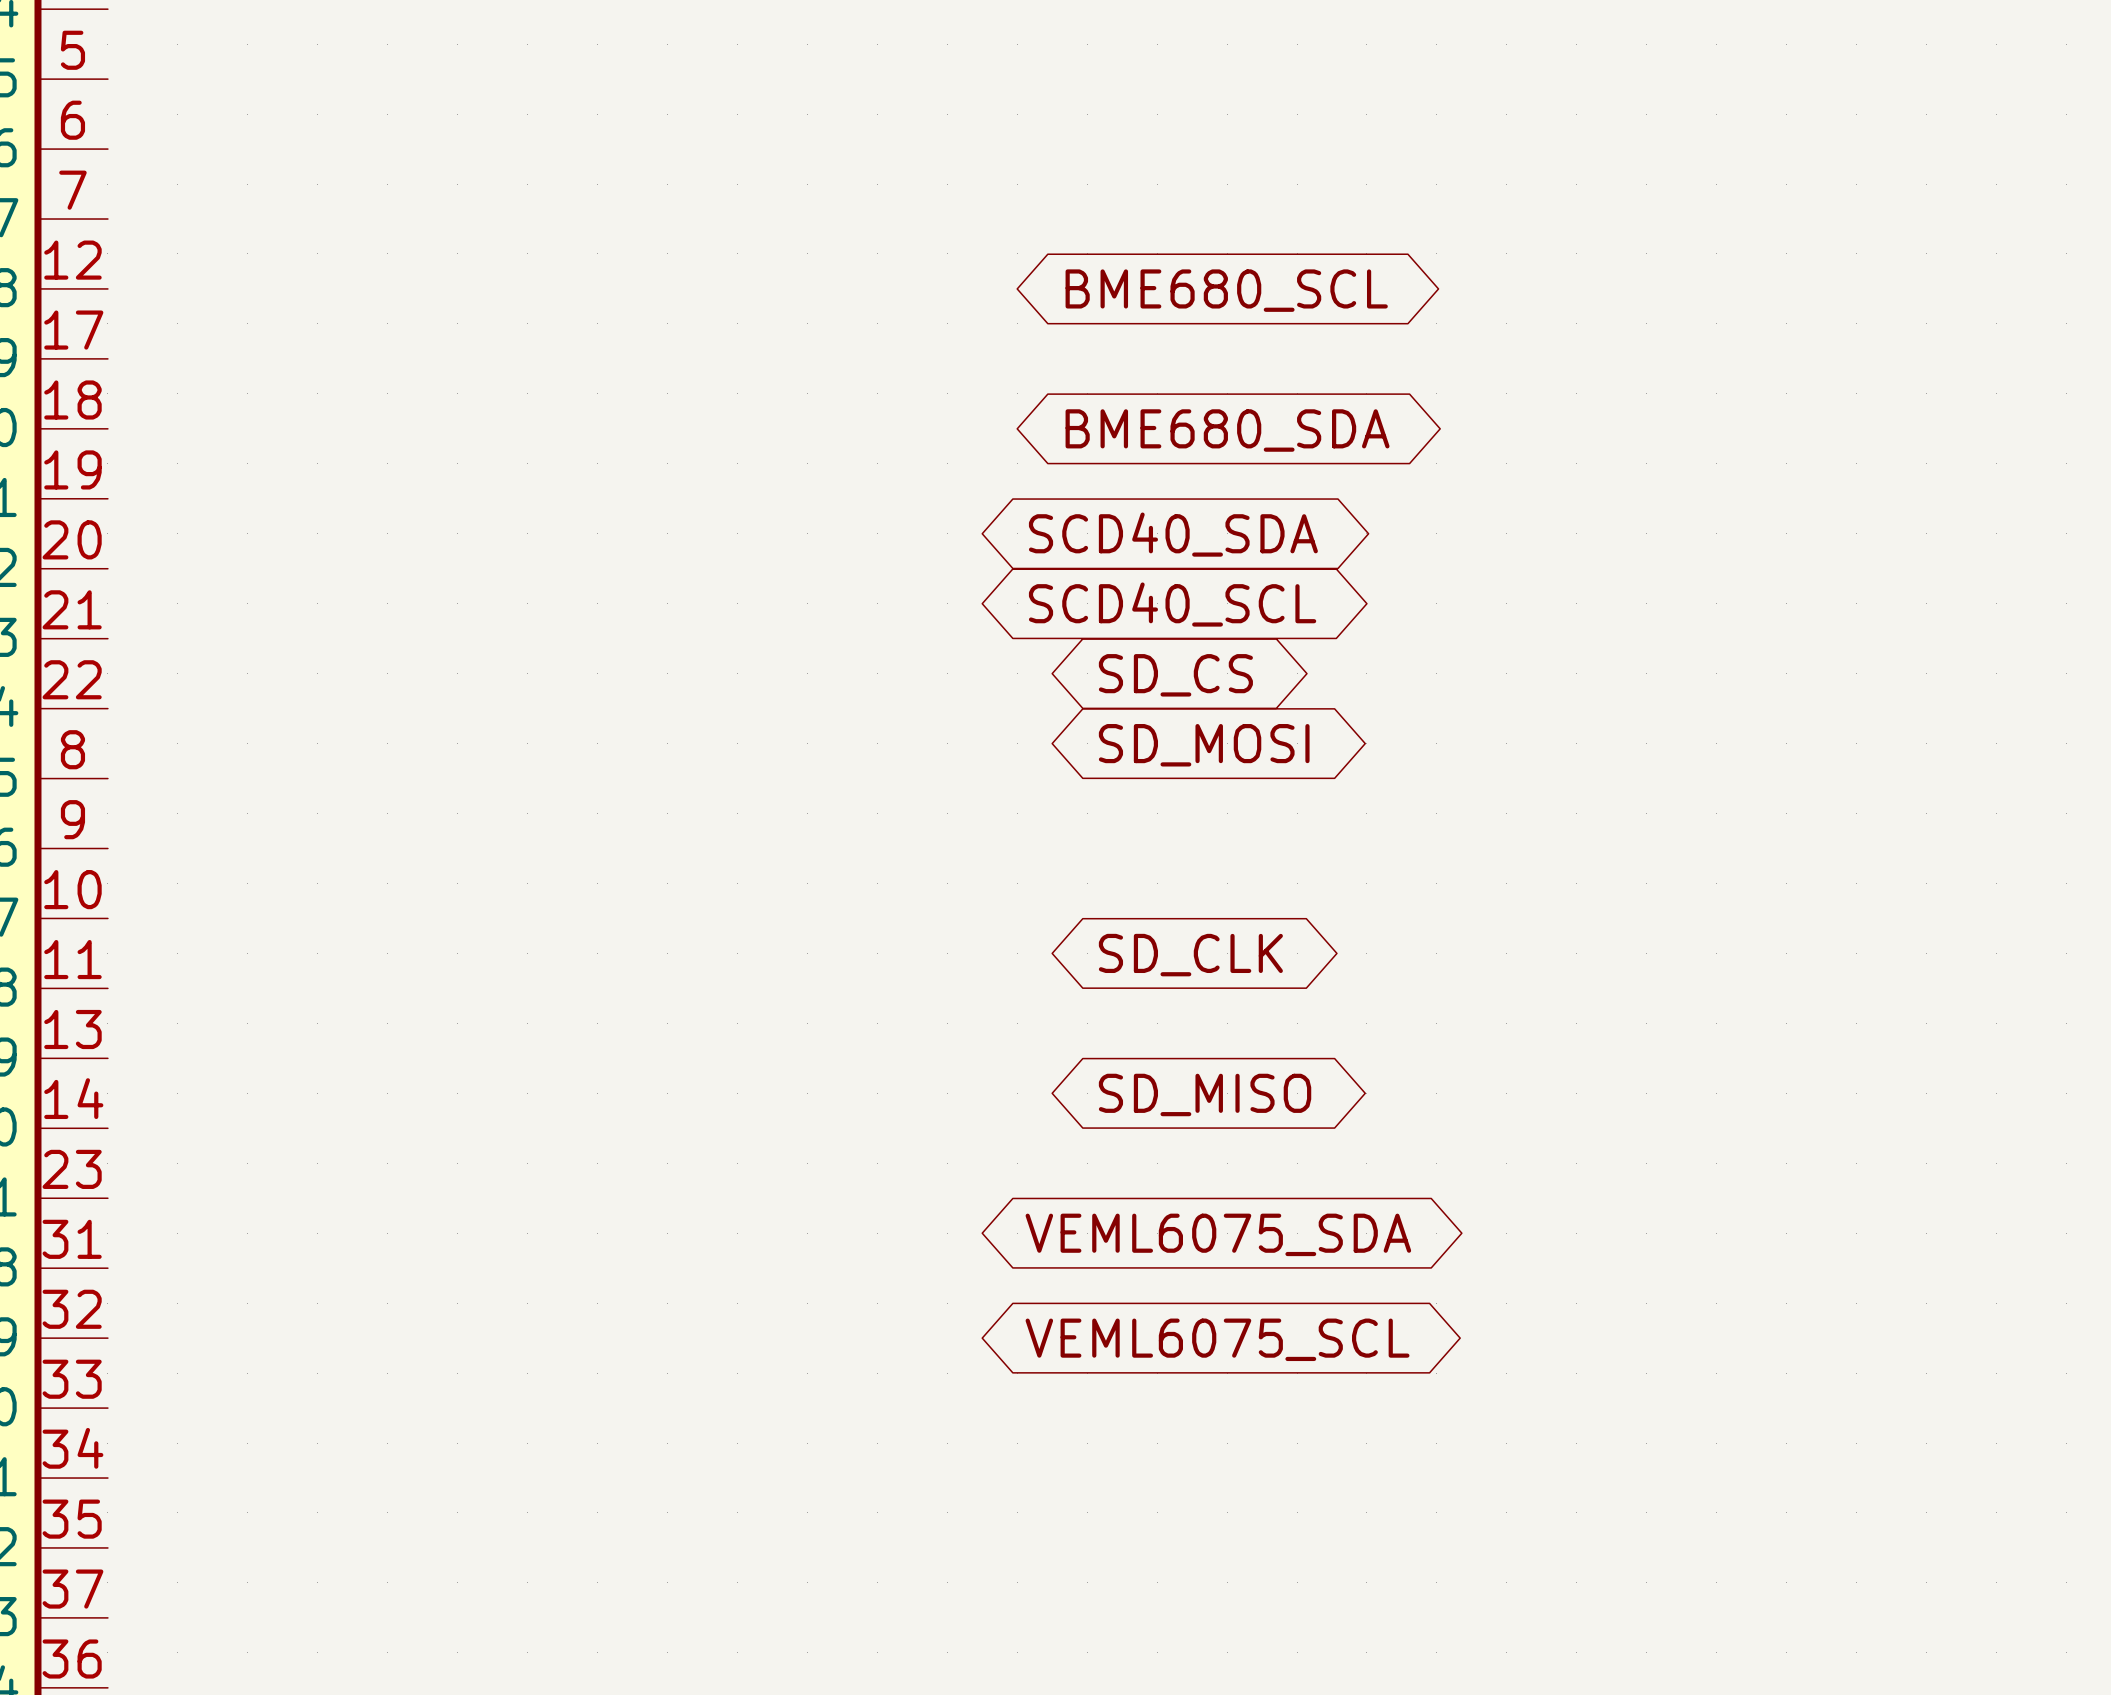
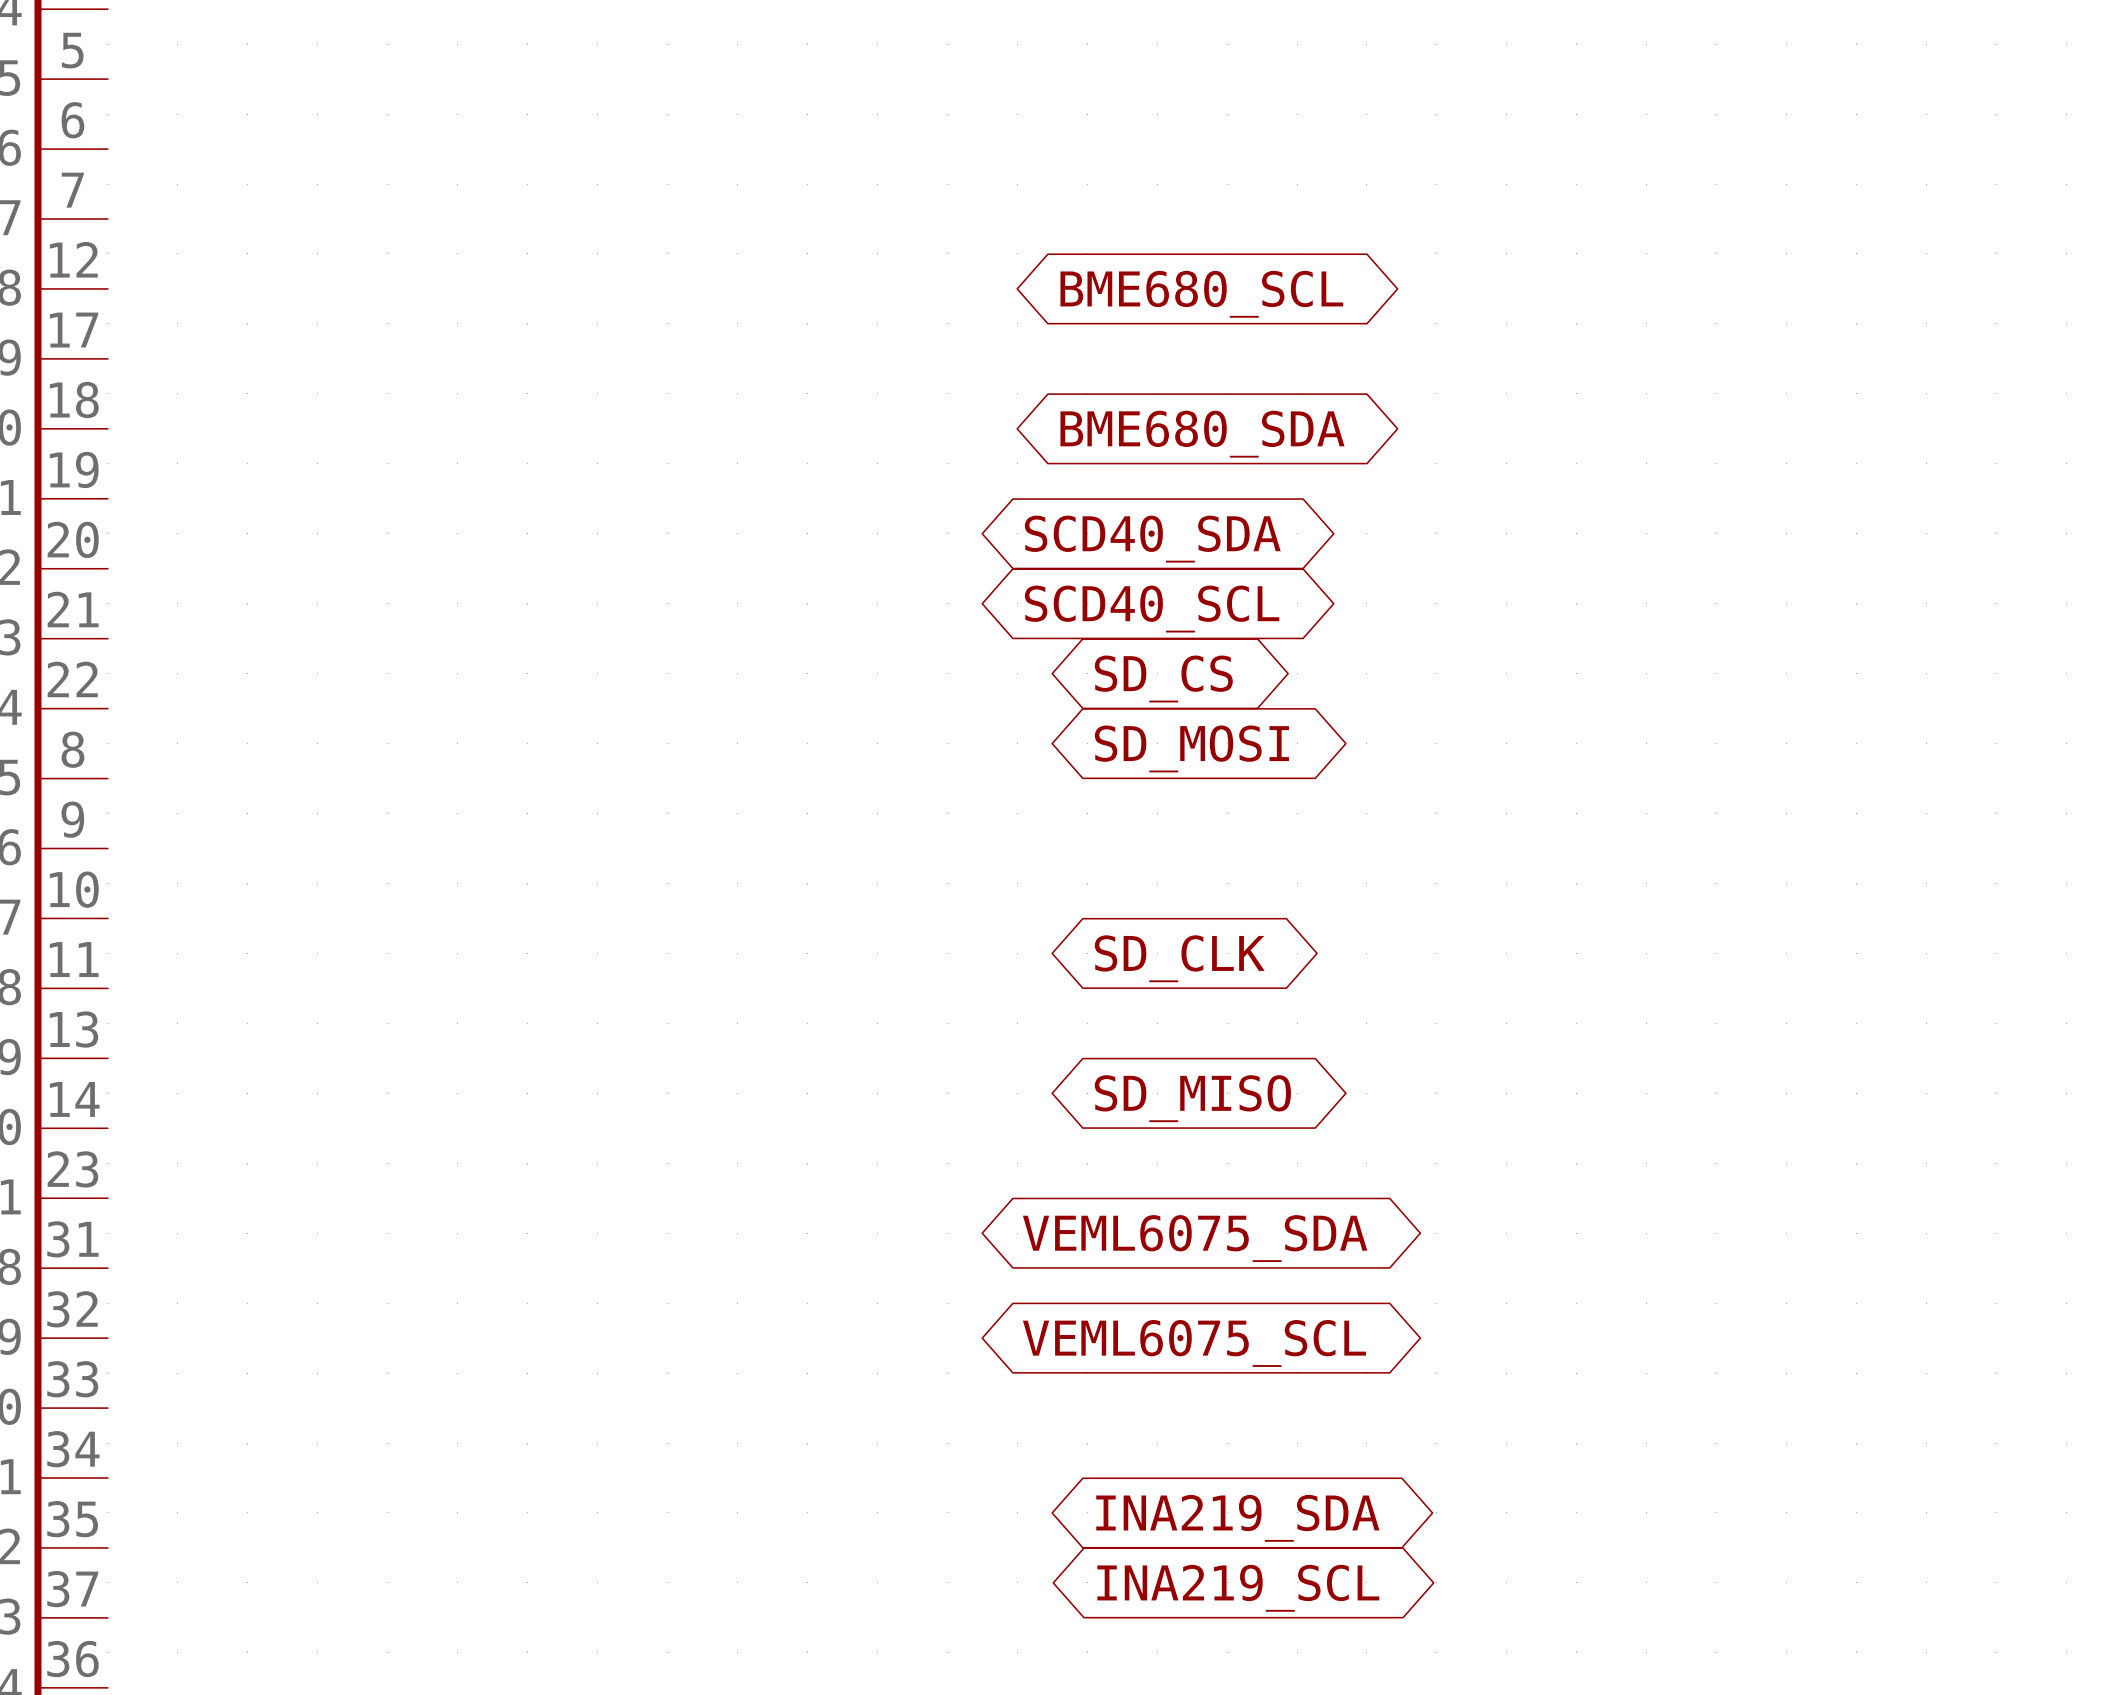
global label: none -> INA219_SDA (1237, 1518)
global label: none -> INA219_SCL (1238, 1588)

